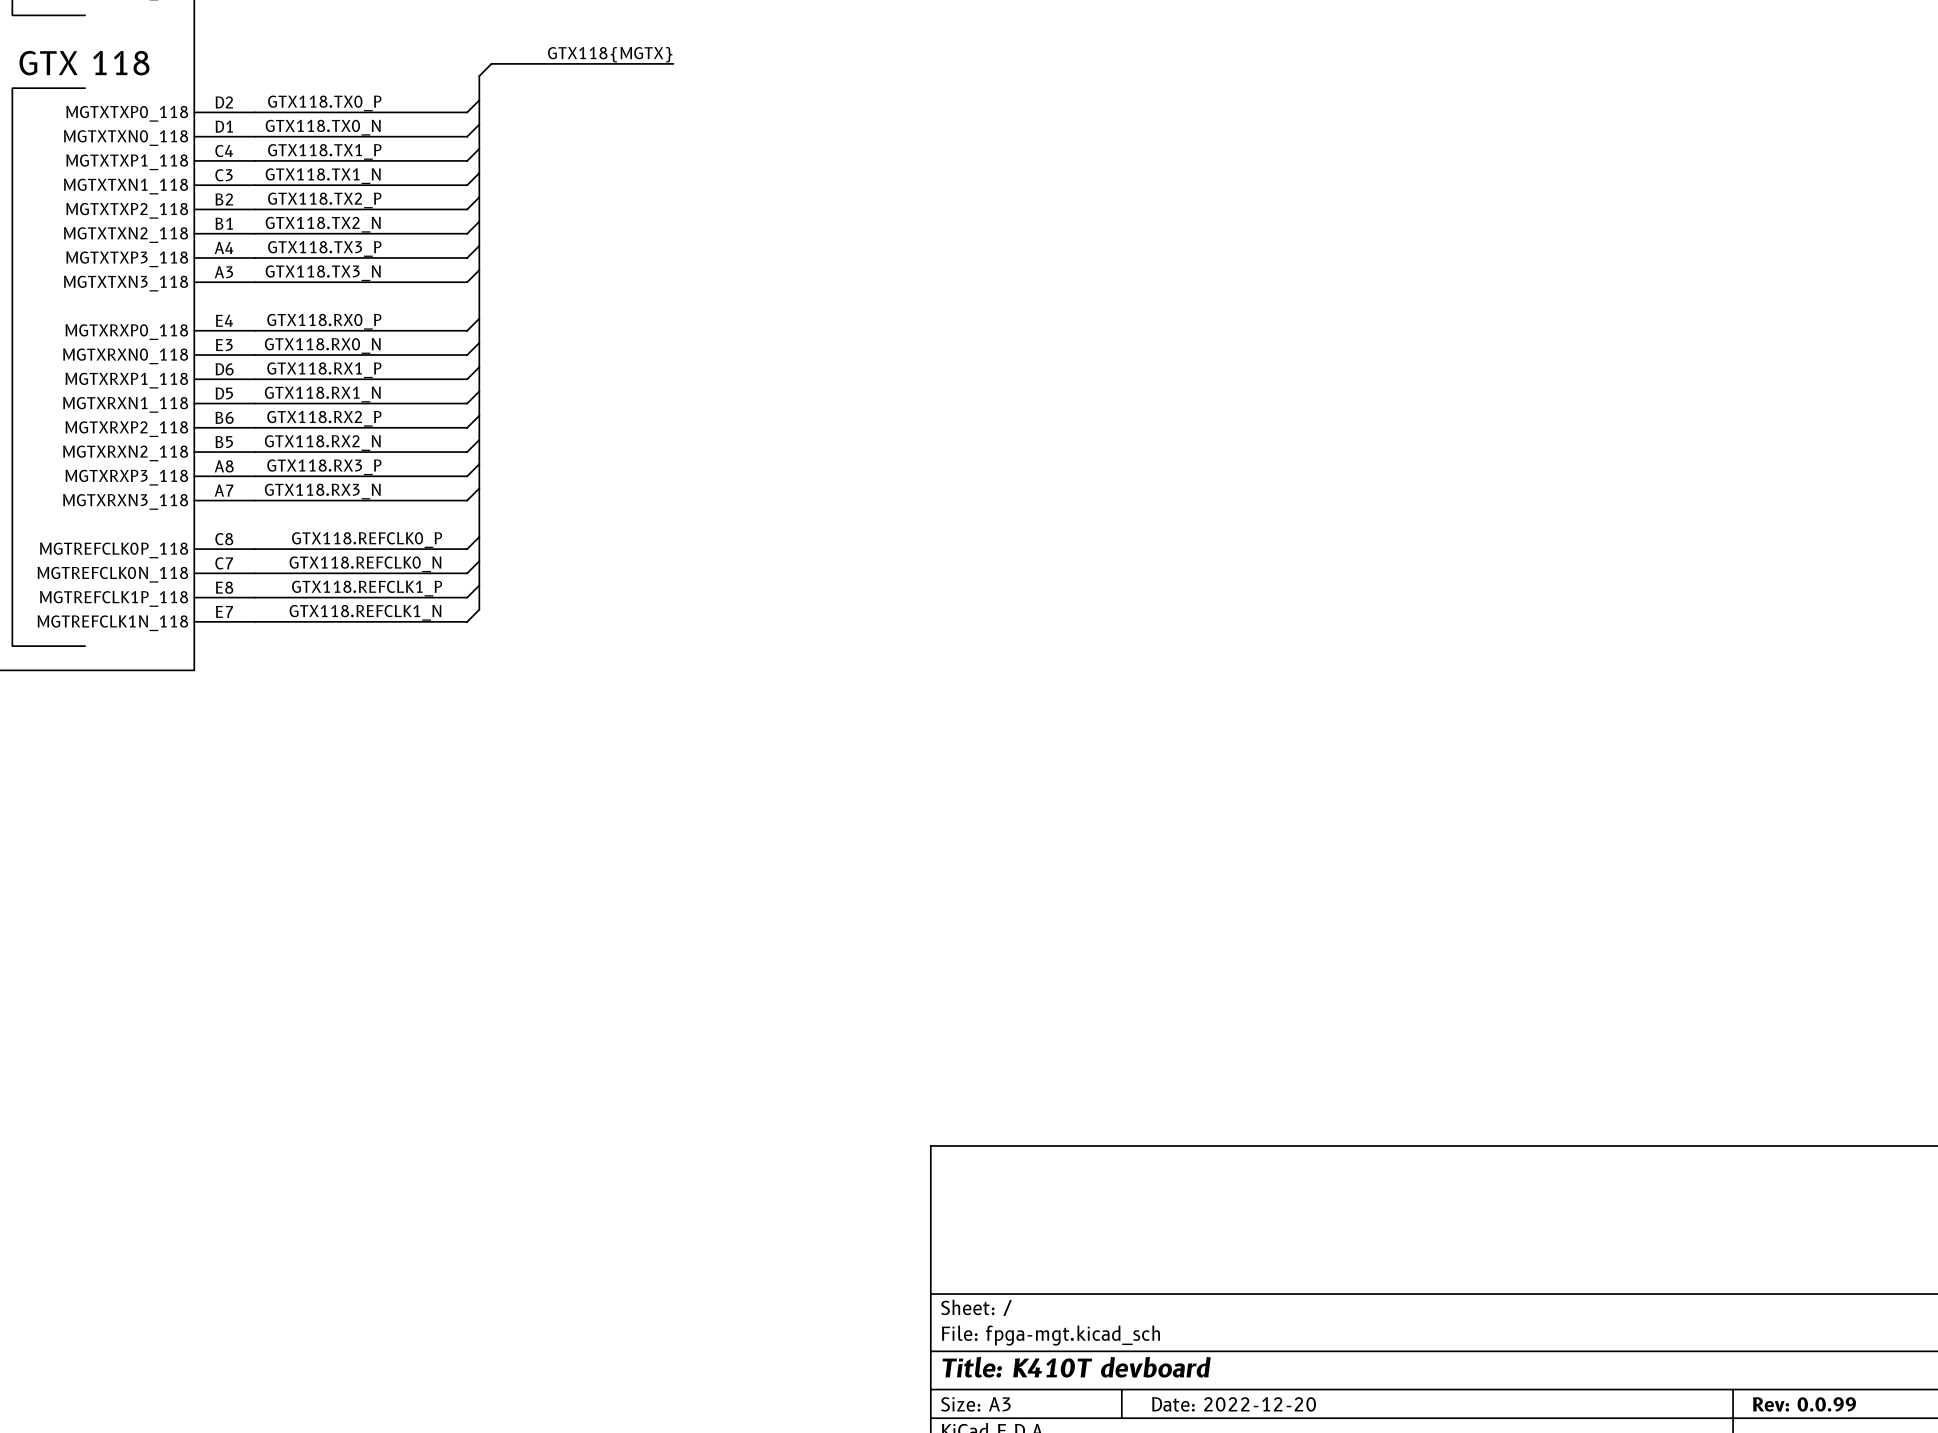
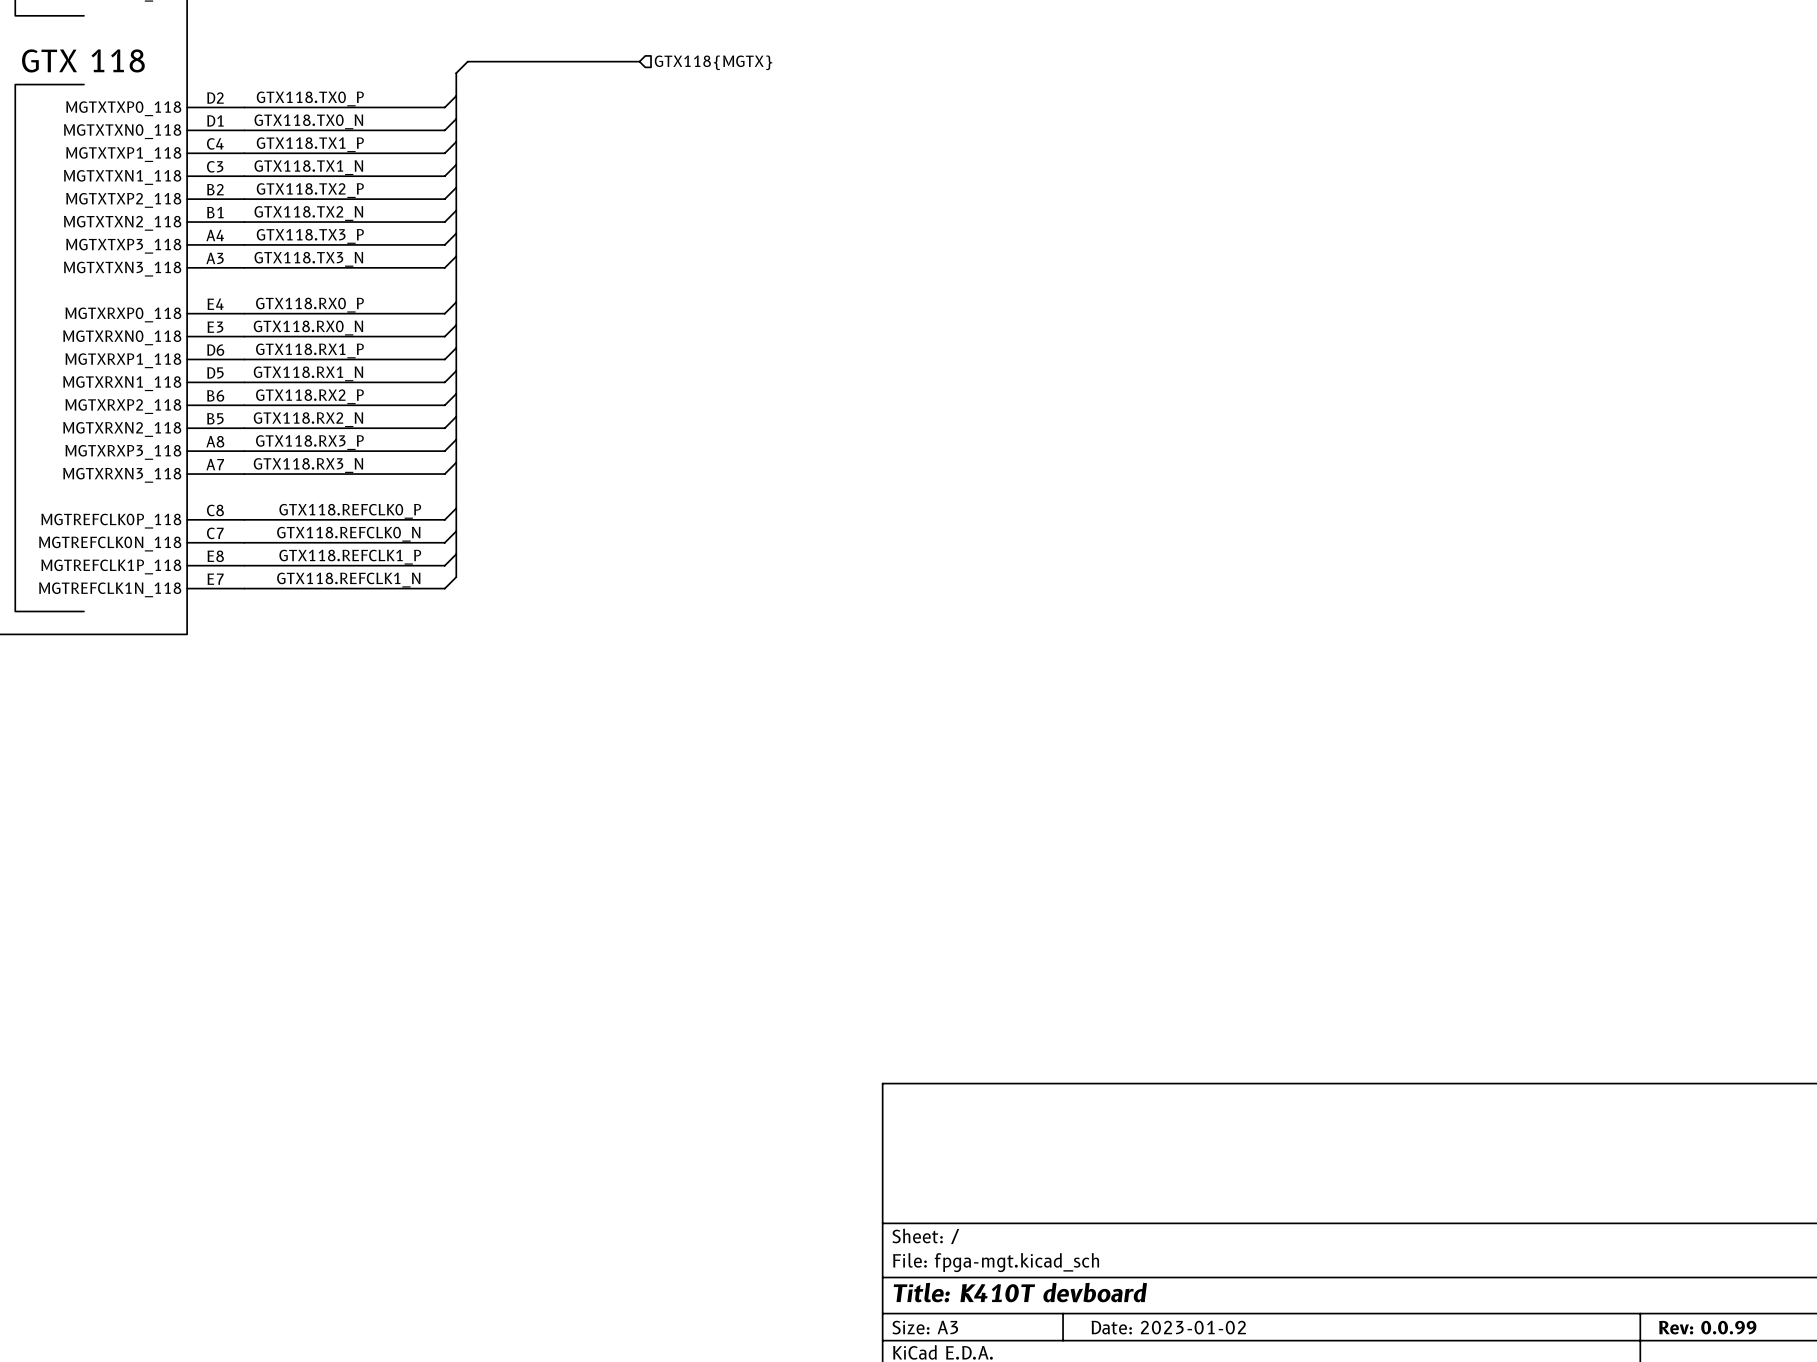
label: GTX118{MGTX} (610, 54) -> none
hierarchical label: none -> GTX118{MGTX} (713, 62)
title block: Date: 2022-12-20 (1234, 1404) -> Date: 2023-01-02 (1168, 1327)

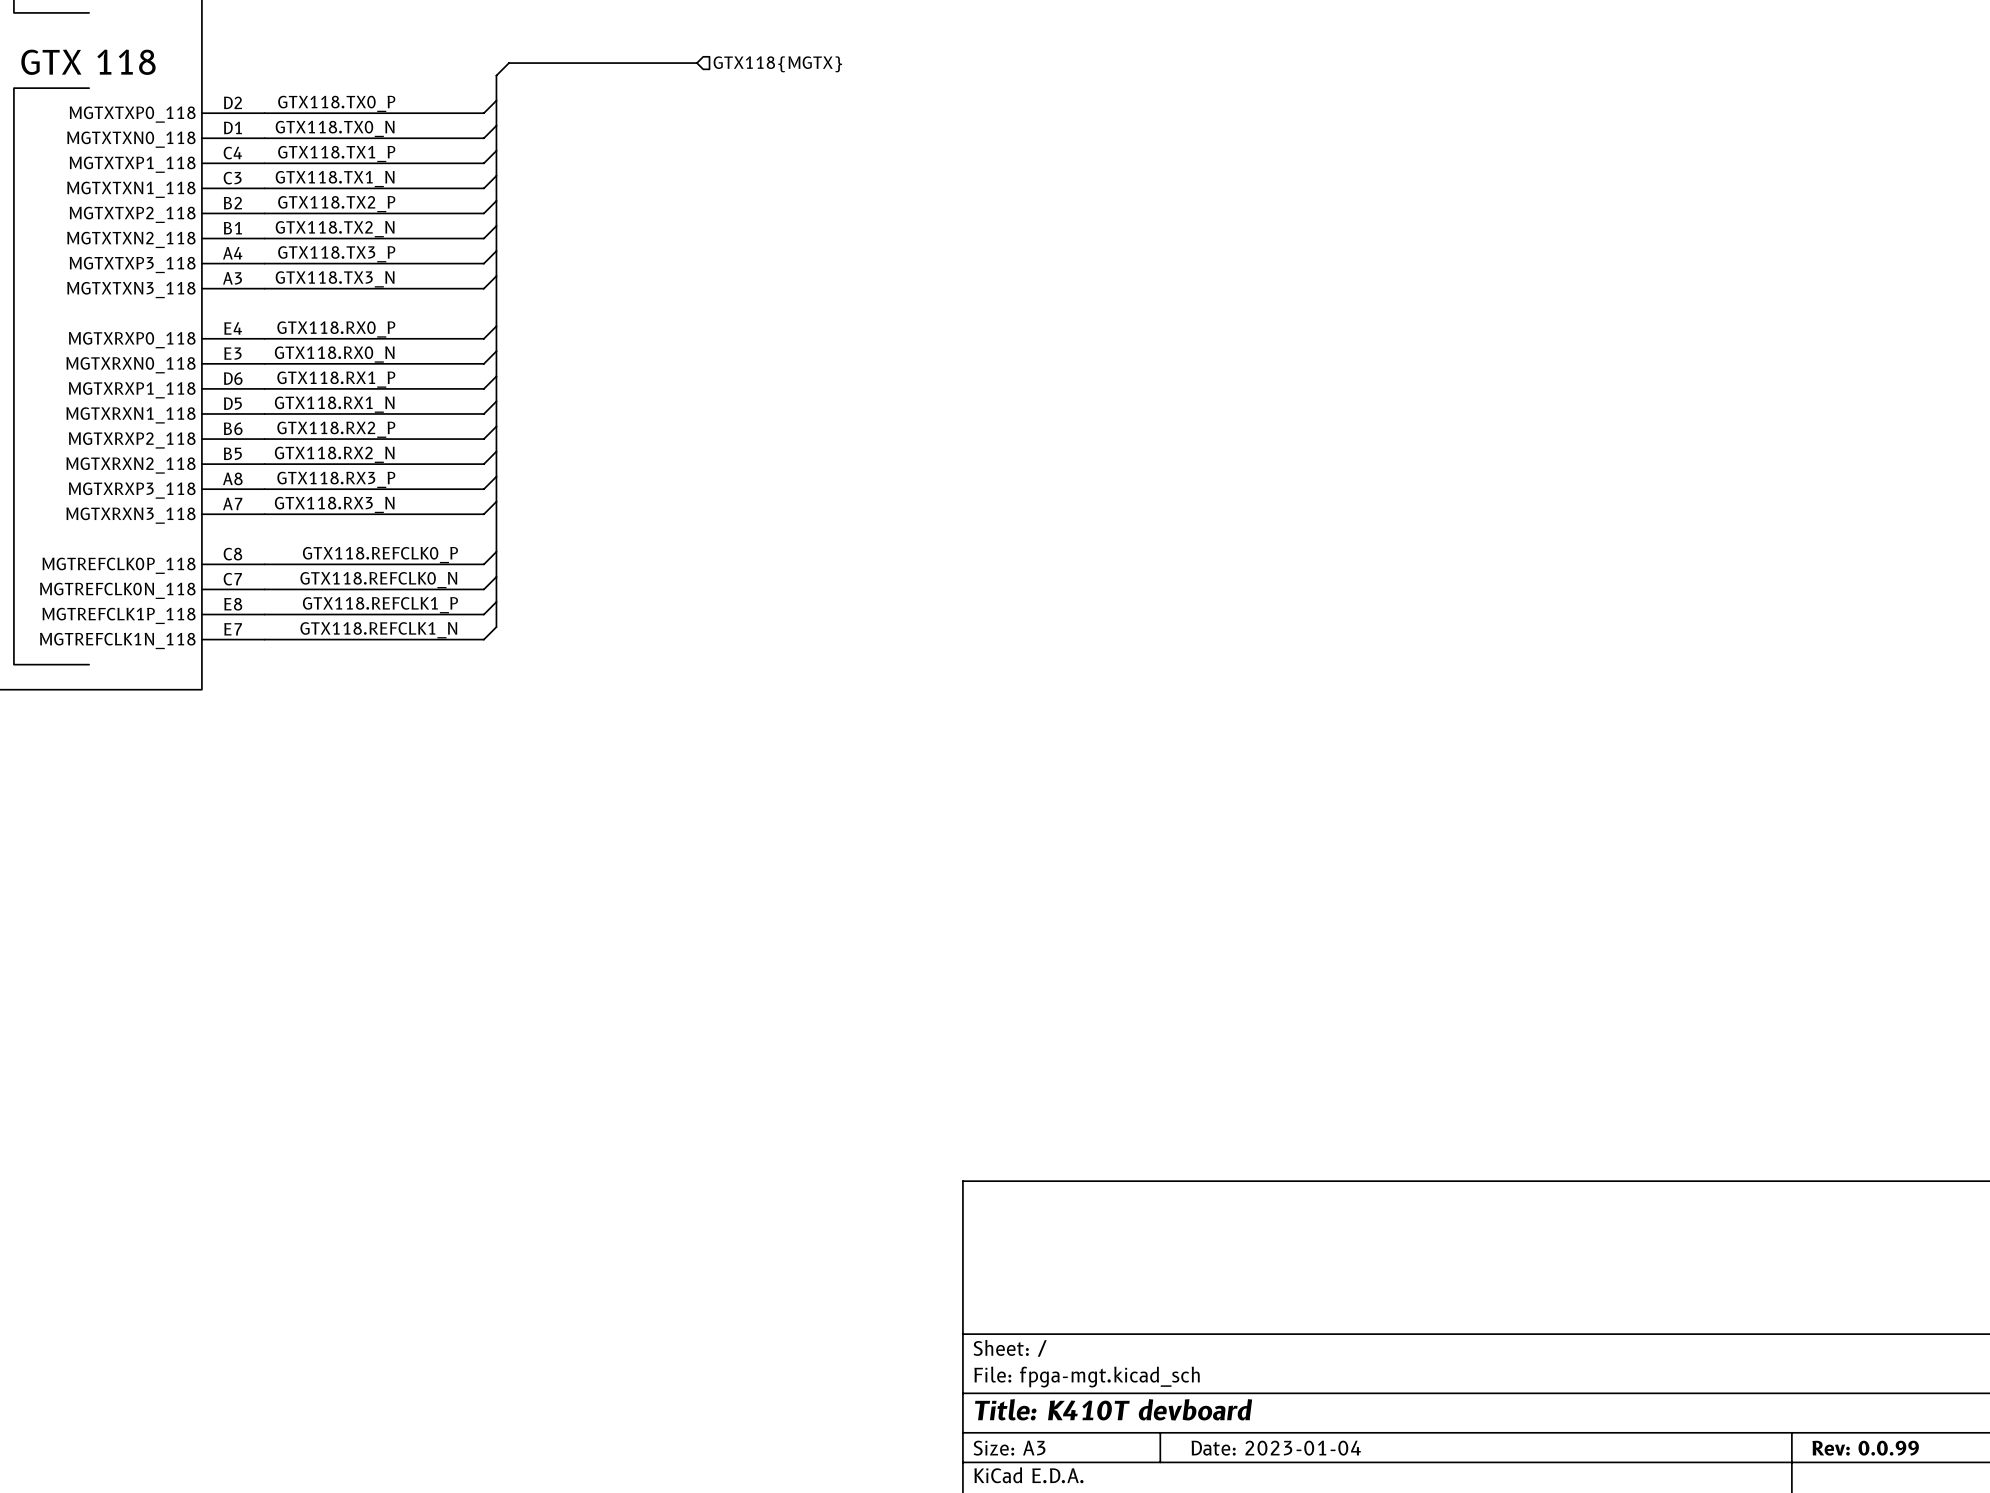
title block: Date: 2023-01-02 (1168, 1327) -> Date: 2023-01-04 (1276, 1448)

